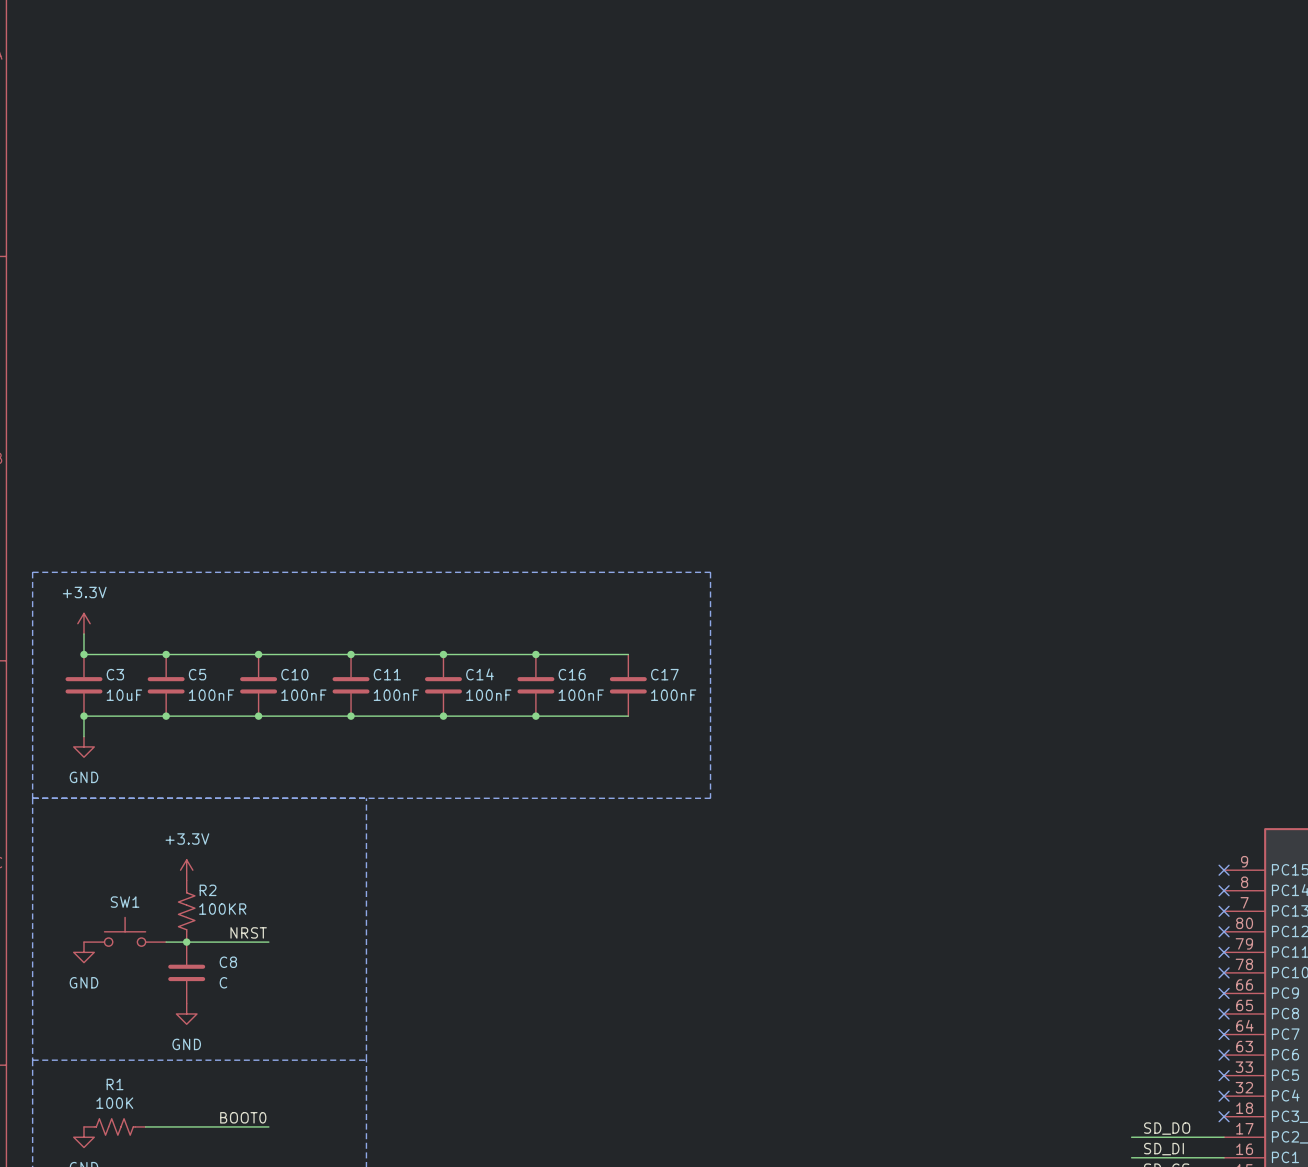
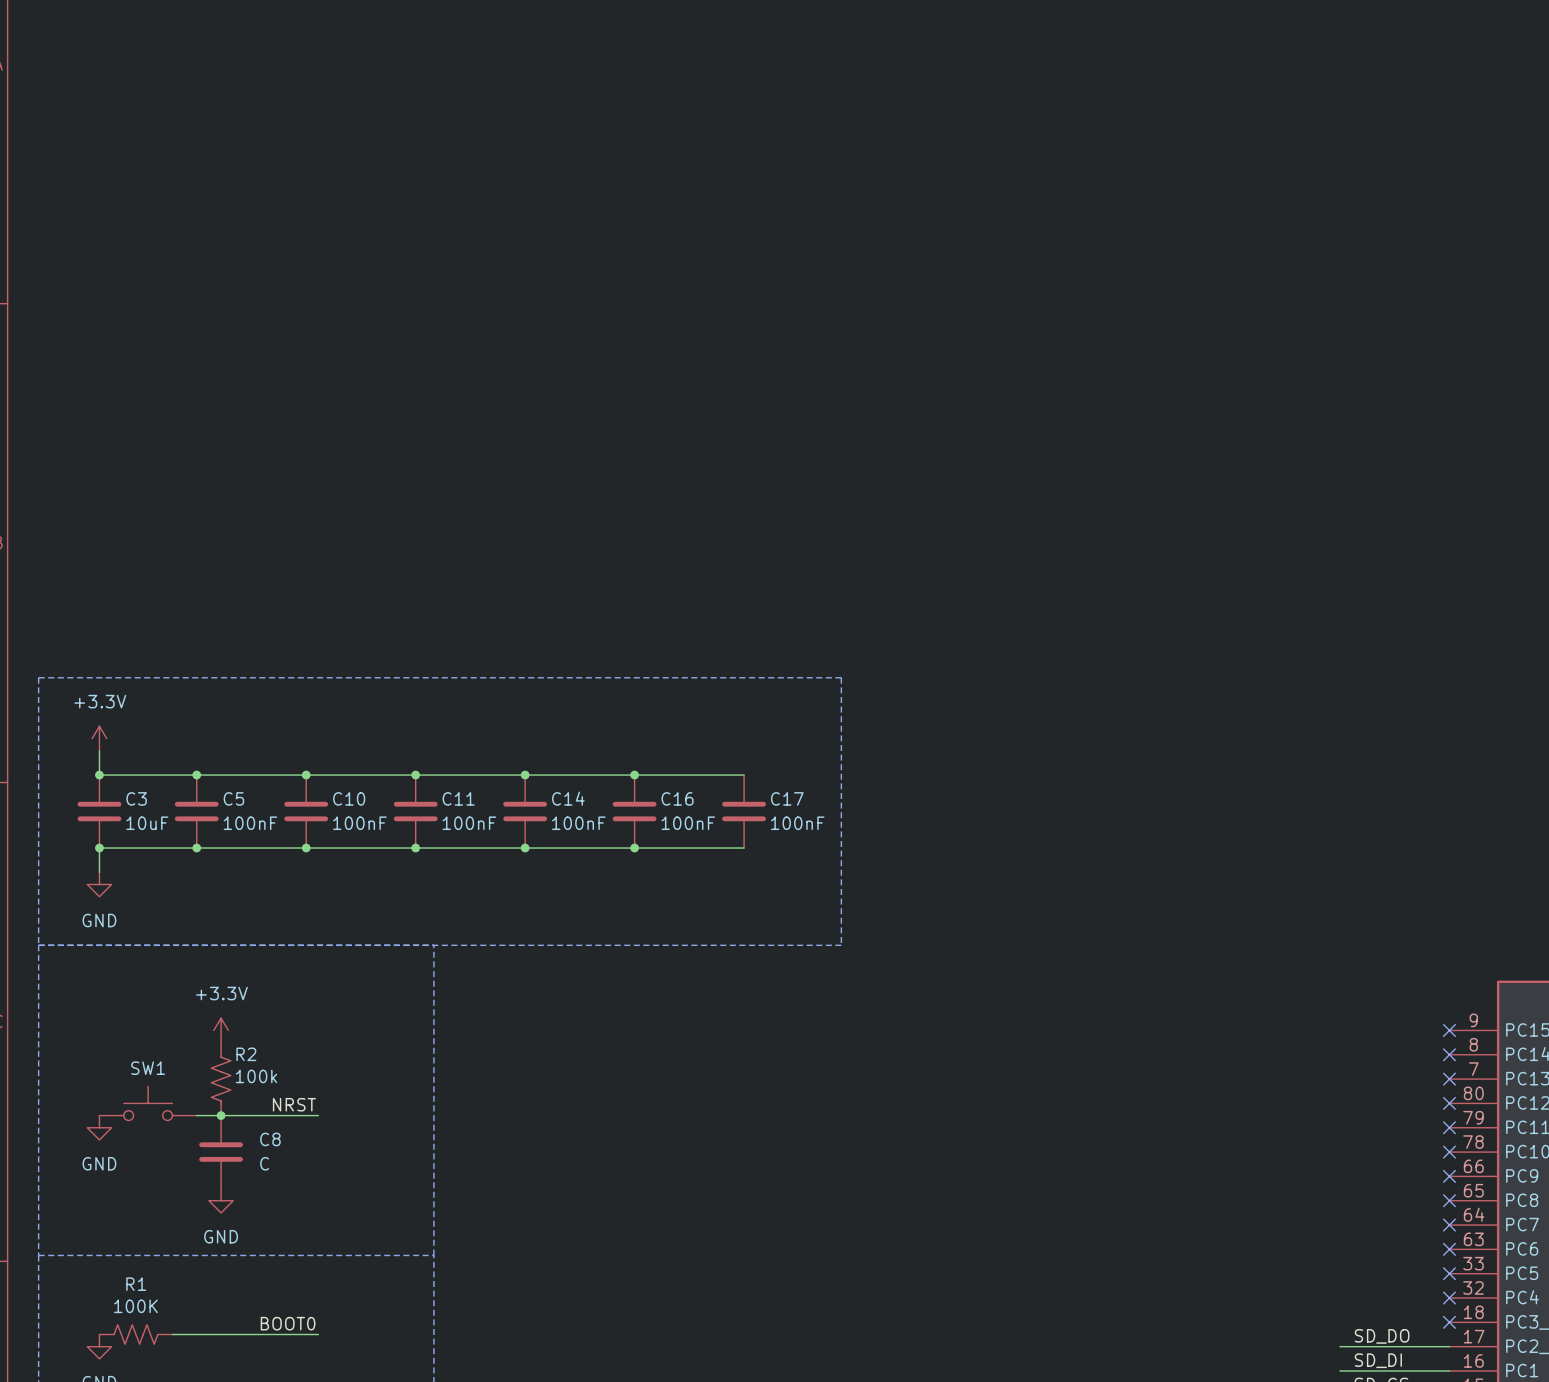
R2 value: 100KR (222, 909) -> 100k (256, 1076)

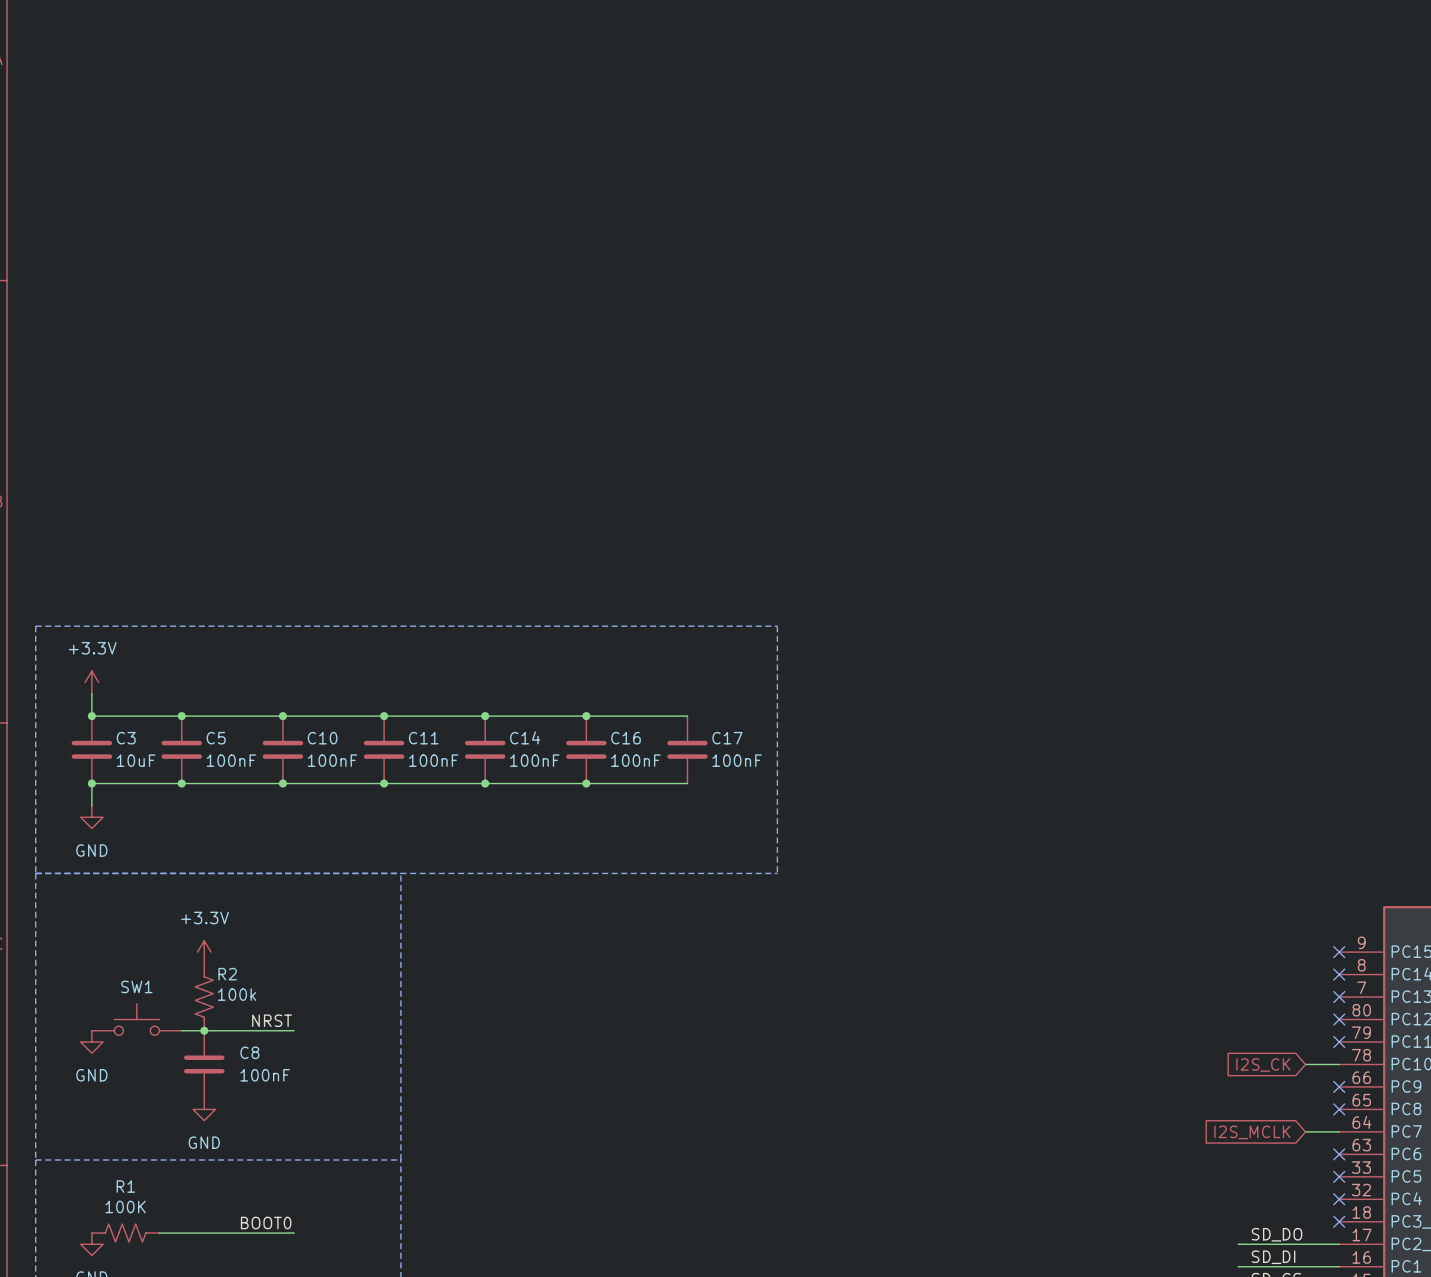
global label: none -> I2S_CK (1263, 1065)
wire: none -> (1305, 1064) (1339, 1064)
no-connect mark: (1449, 1152) -> none
C8 value: C (264, 1163) -> 100nF (265, 1075)
global label: none -> I2S_MCLK (1252, 1132)
wire: none -> (1305, 1131) (1339, 1131)
no-connect mark: (1449, 1225) -> none

